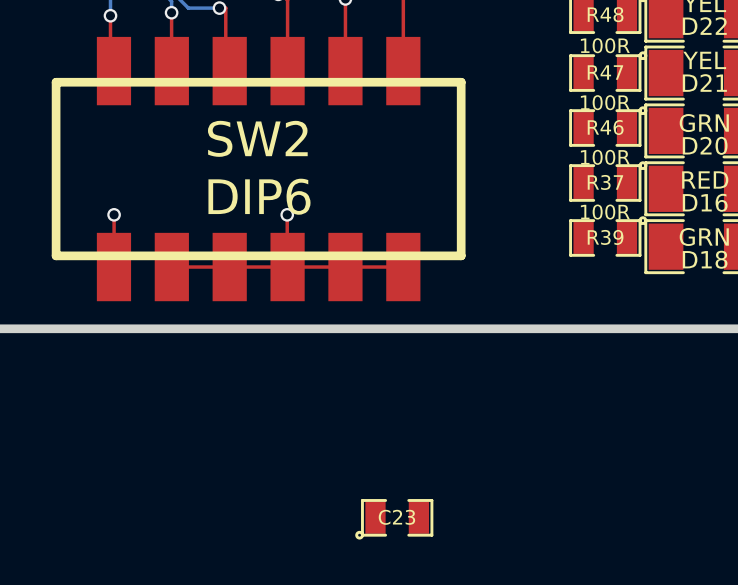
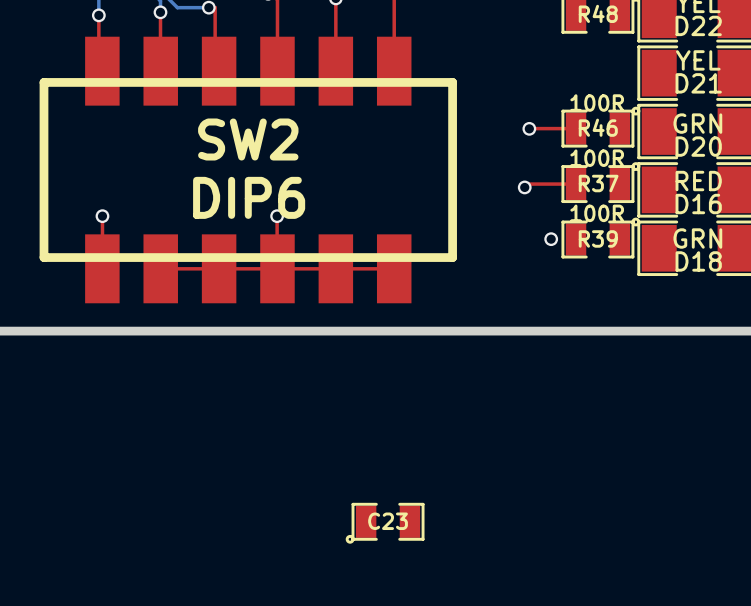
R47: 100R (608, 71) -> none
top track: none -> (529, 128) (576, 128)
via: none -> (529, 128)
top track: none -> (576, 184) (528, 184) (524, 187)
via: none -> (524, 187)
via: none -> (551, 239)

